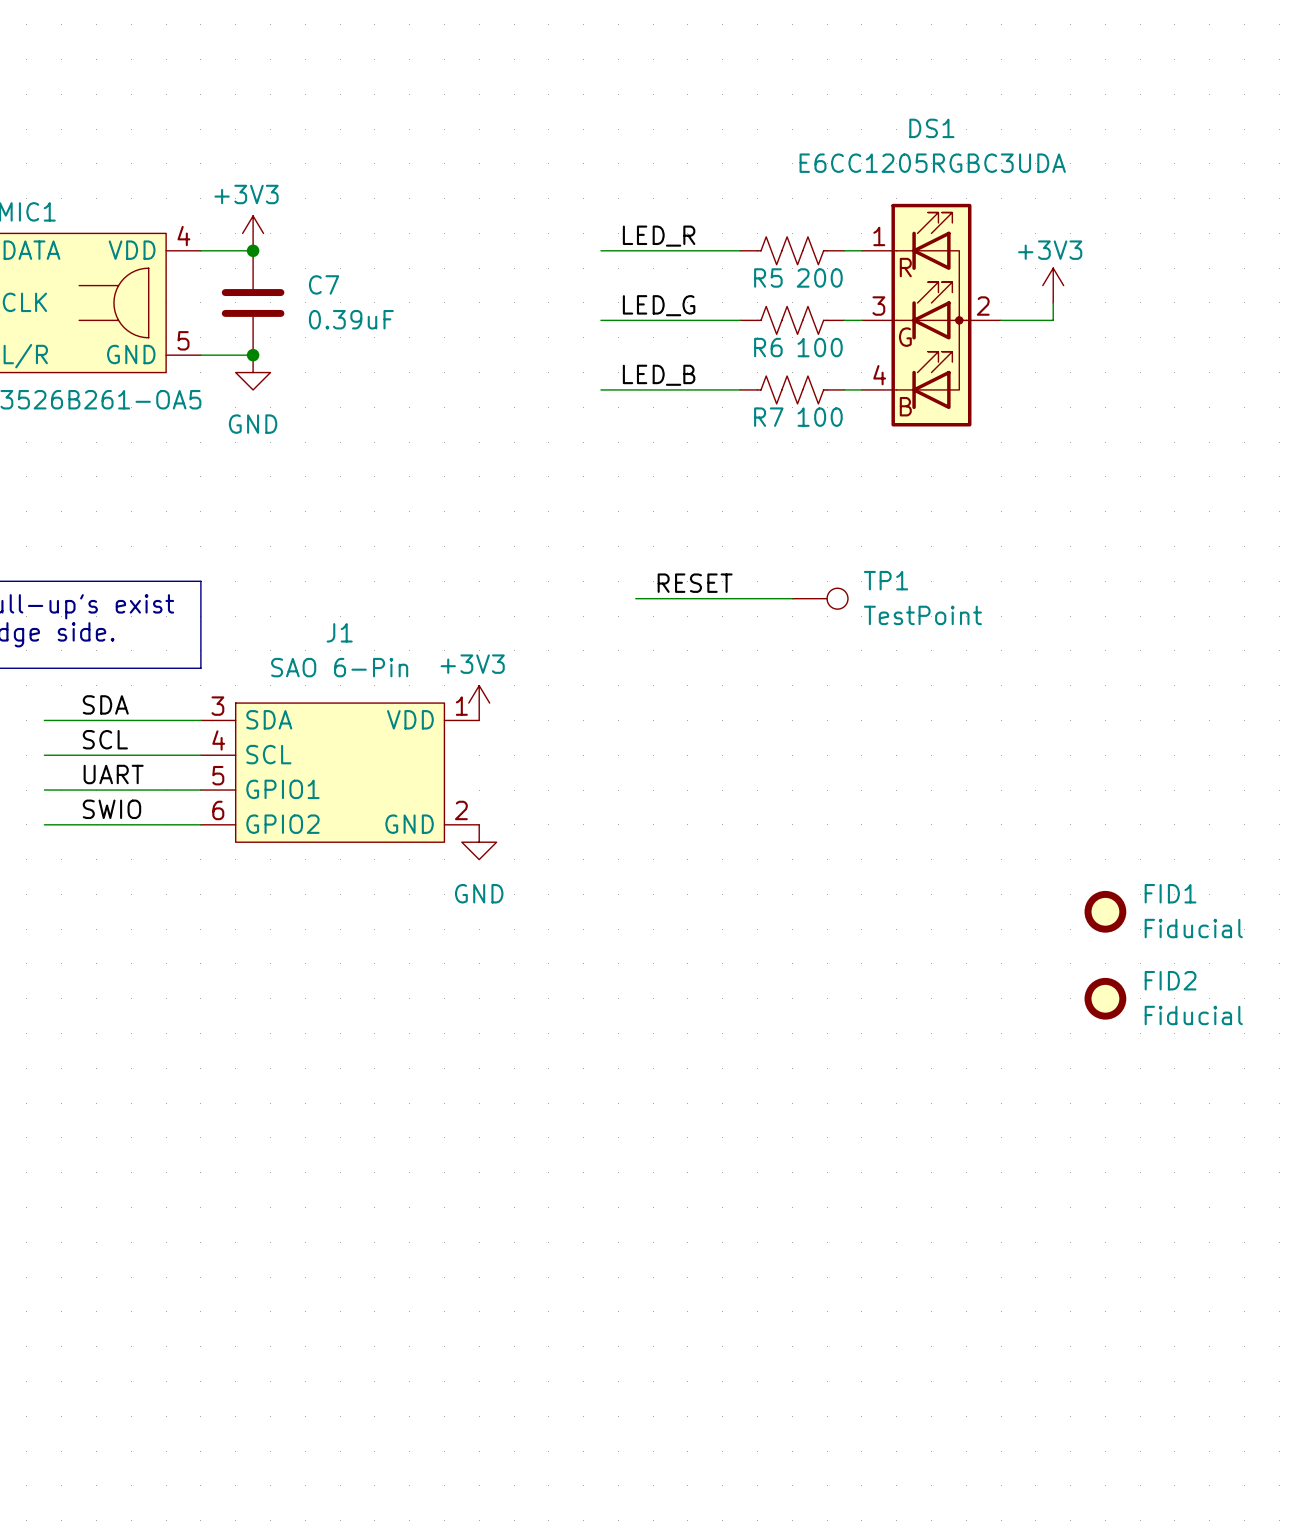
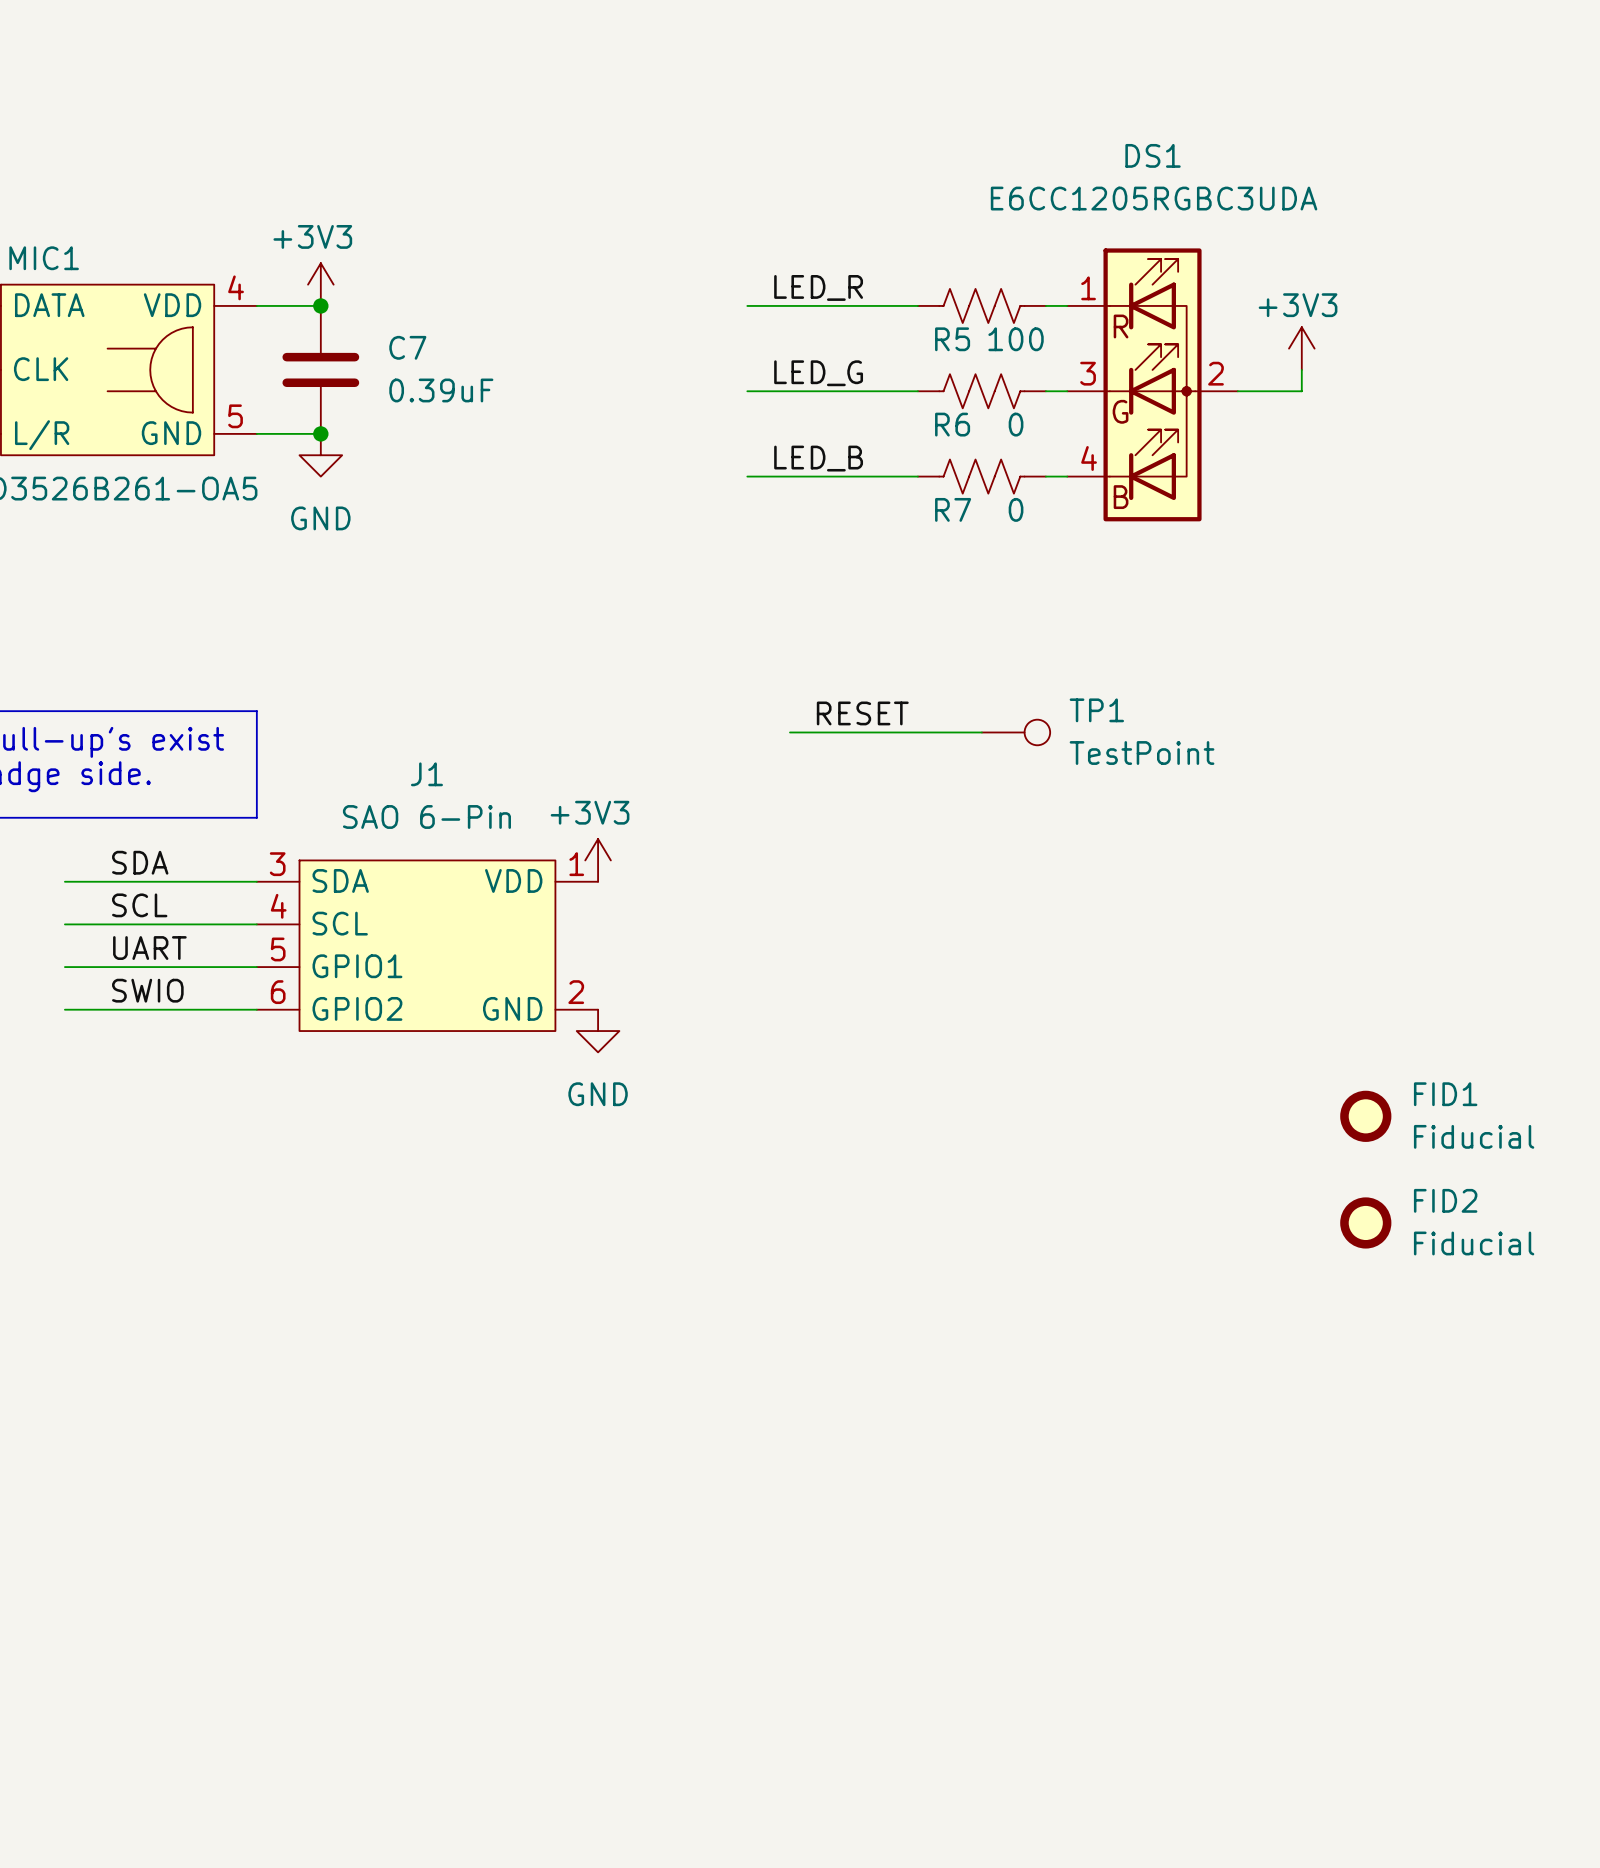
R5 value: 200 (819, 277) -> 100 (1016, 339)
R6 value: 100 (820, 347) -> 0 (1016, 424)
R7 value: 100 (820, 417) -> 0 (1016, 509)

